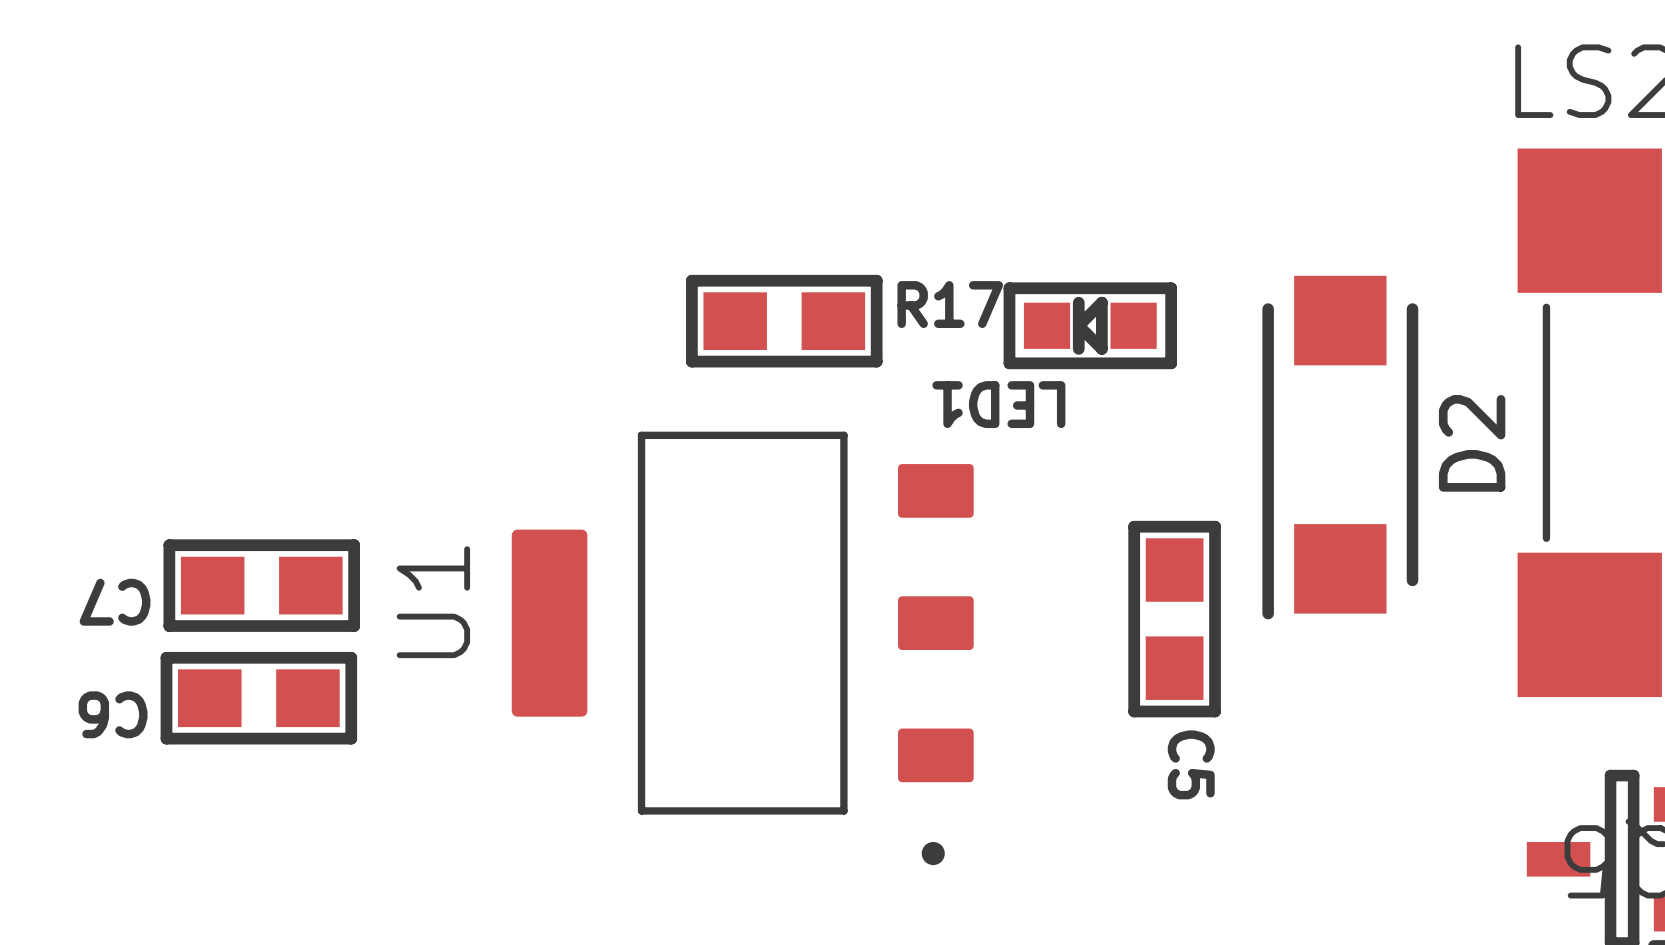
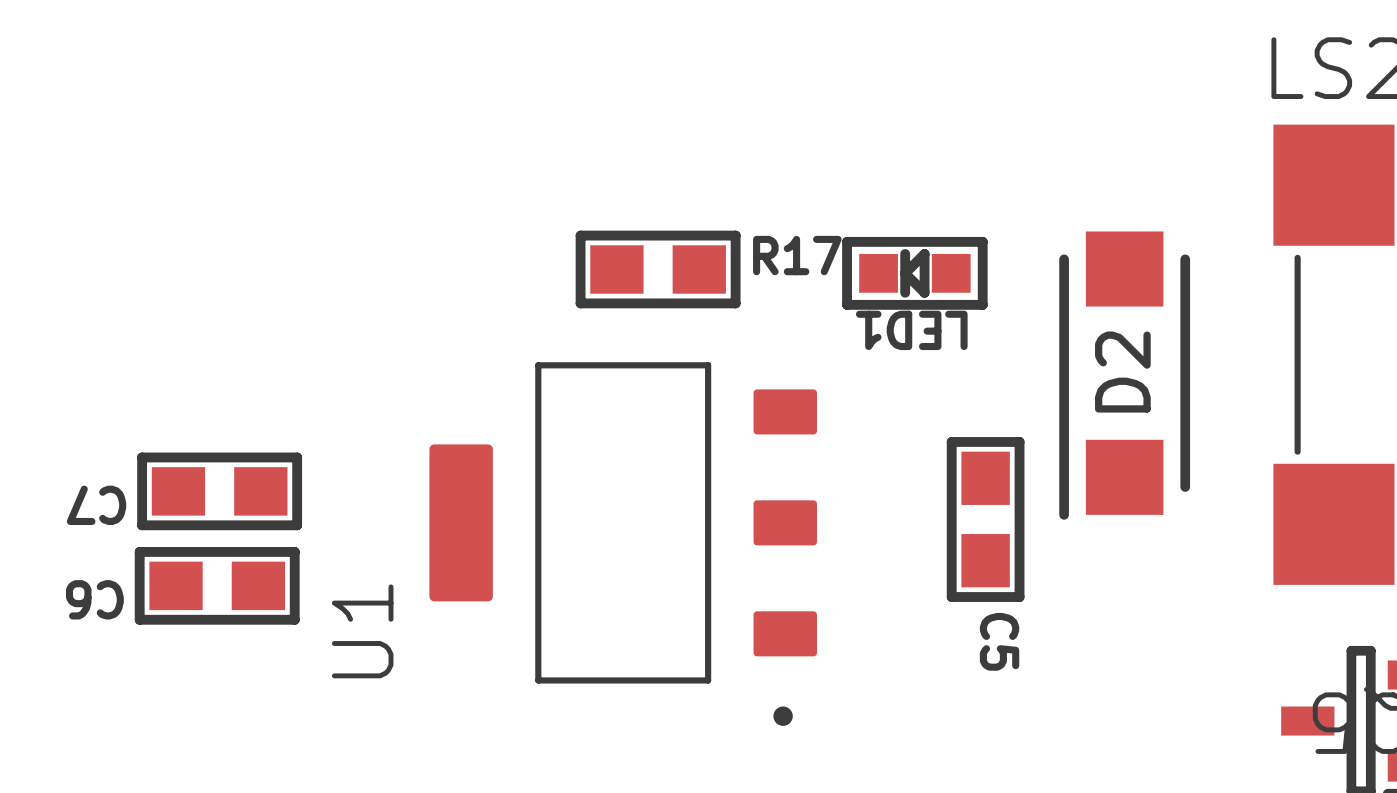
LED1 name position: LED1 (998, 404) -> LED1 (911, 330)
D2 name position: D2 (1472, 443) -> D2 (1122, 372)
U1 name position: U1 (433, 602) -> U1 (362, 631)

